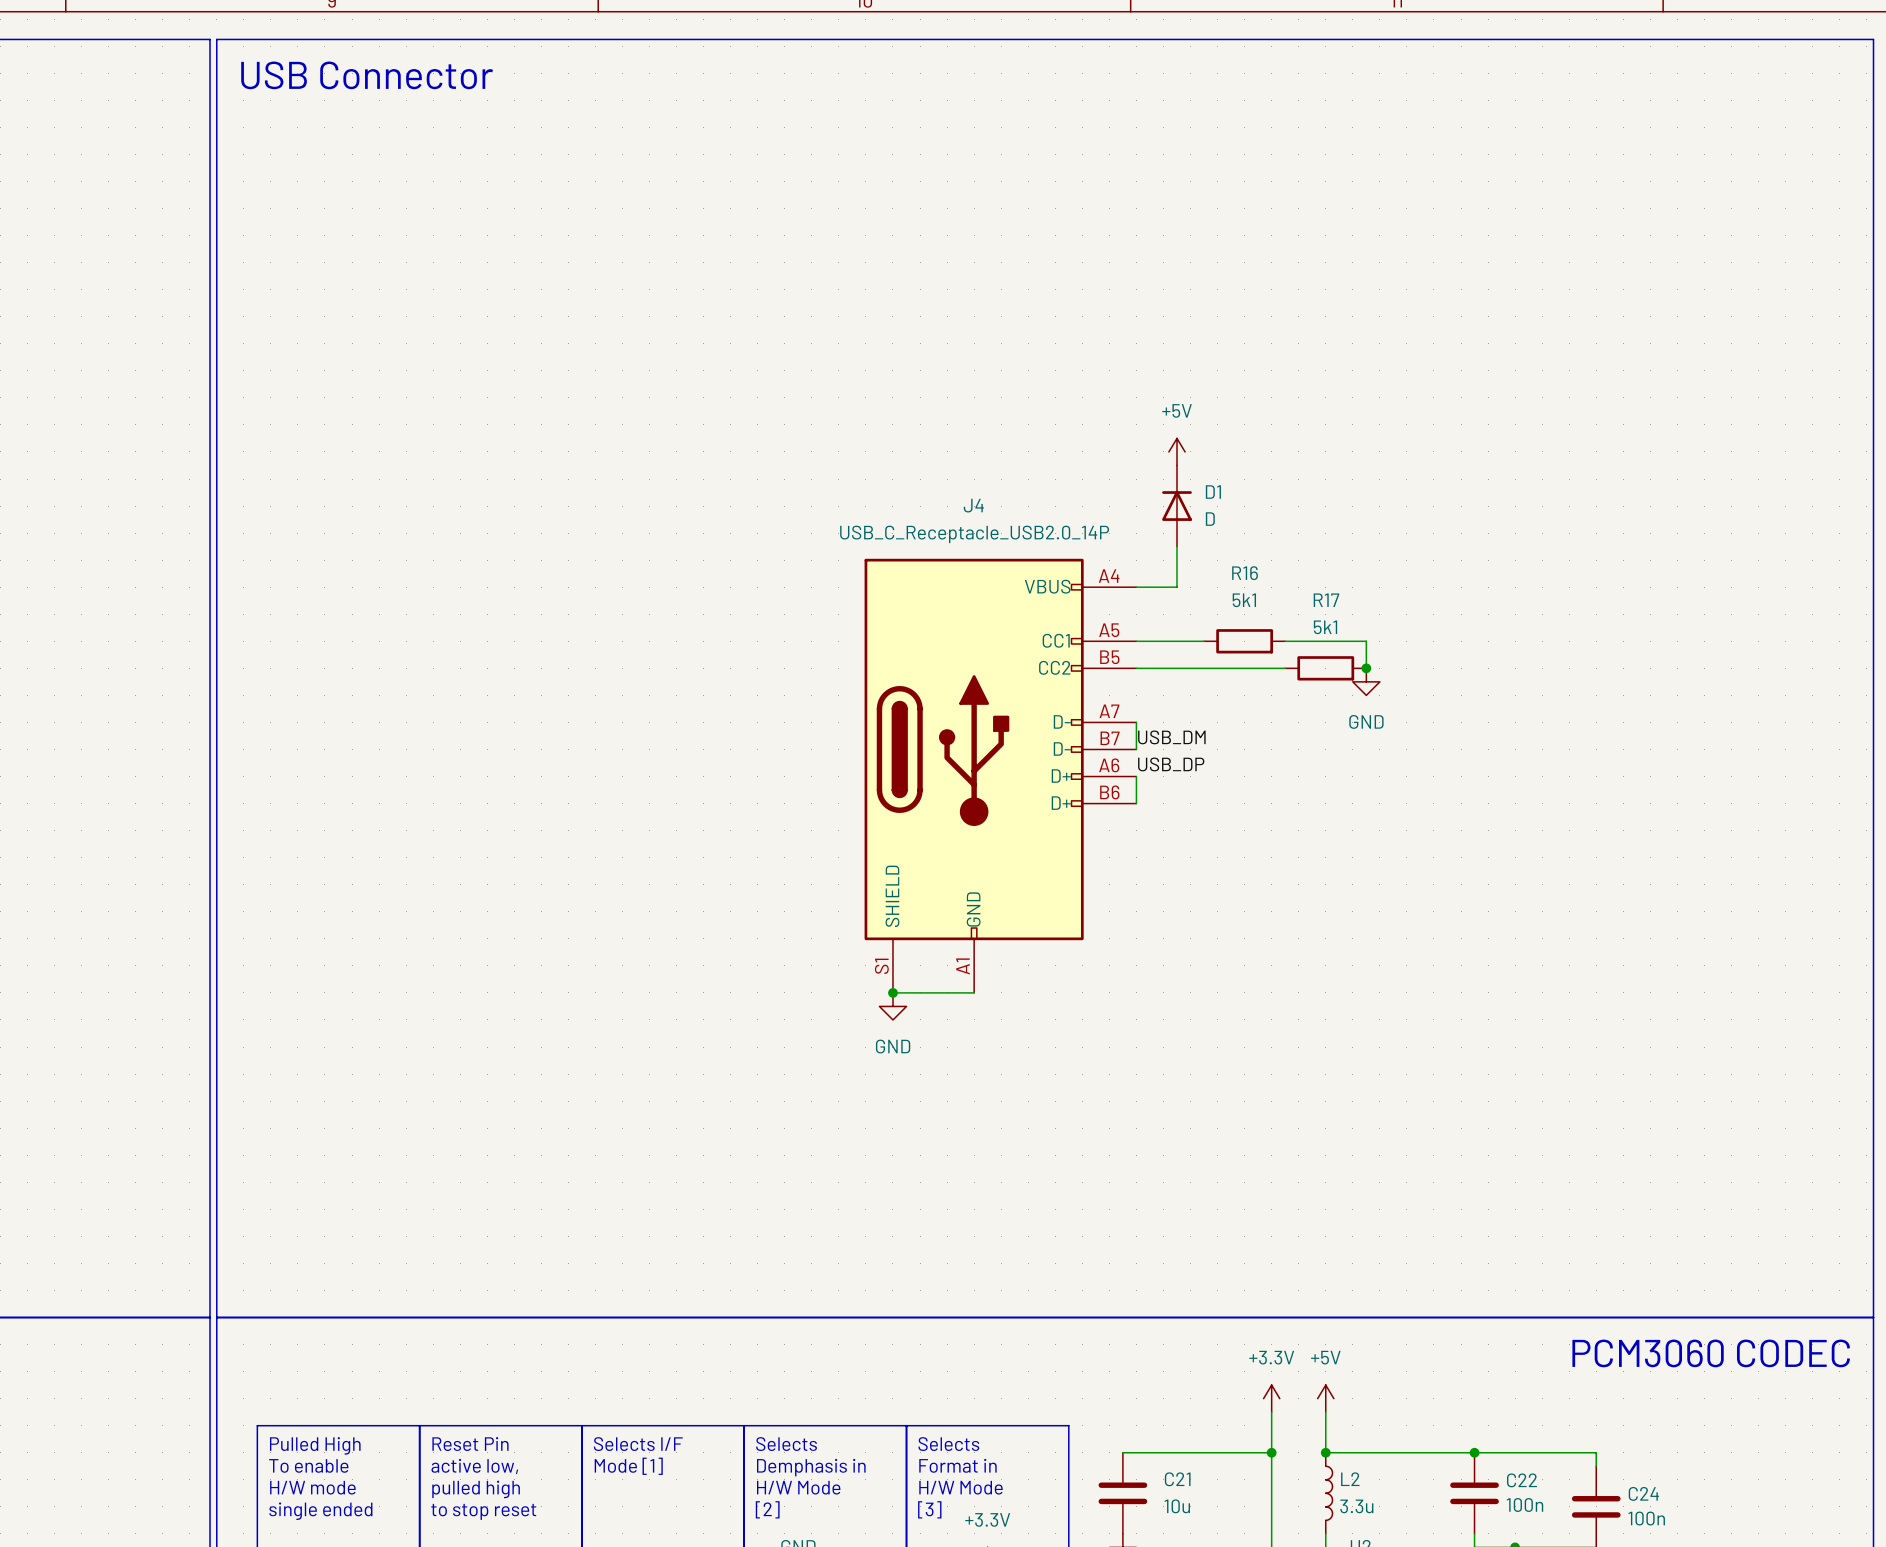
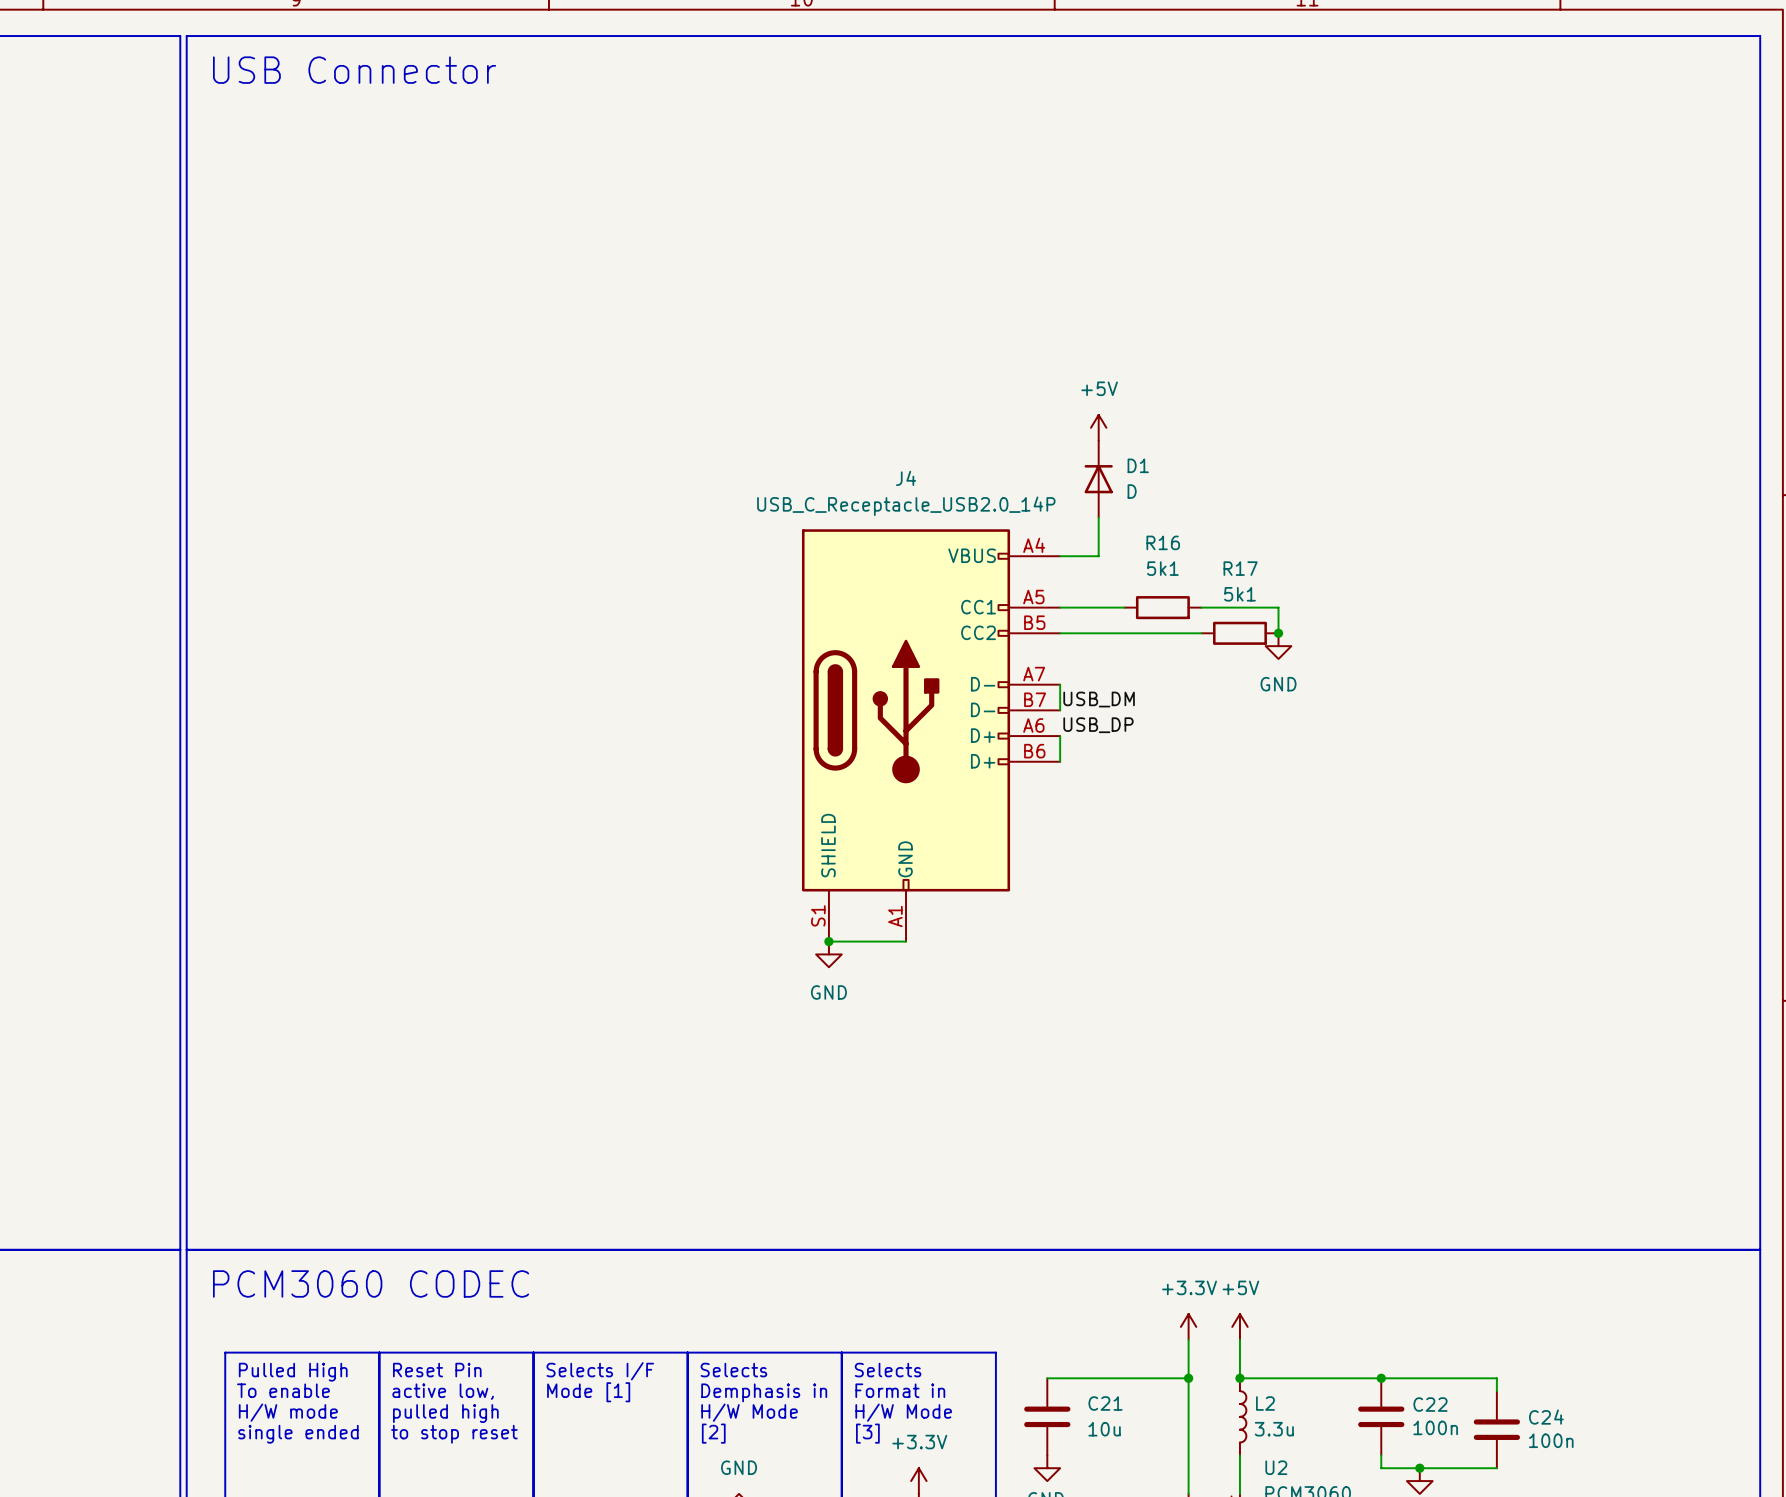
text: none -> PCM3060 CODEC (371, 1283)
text: PCM3060 CODEC (1711, 1353) -> none

